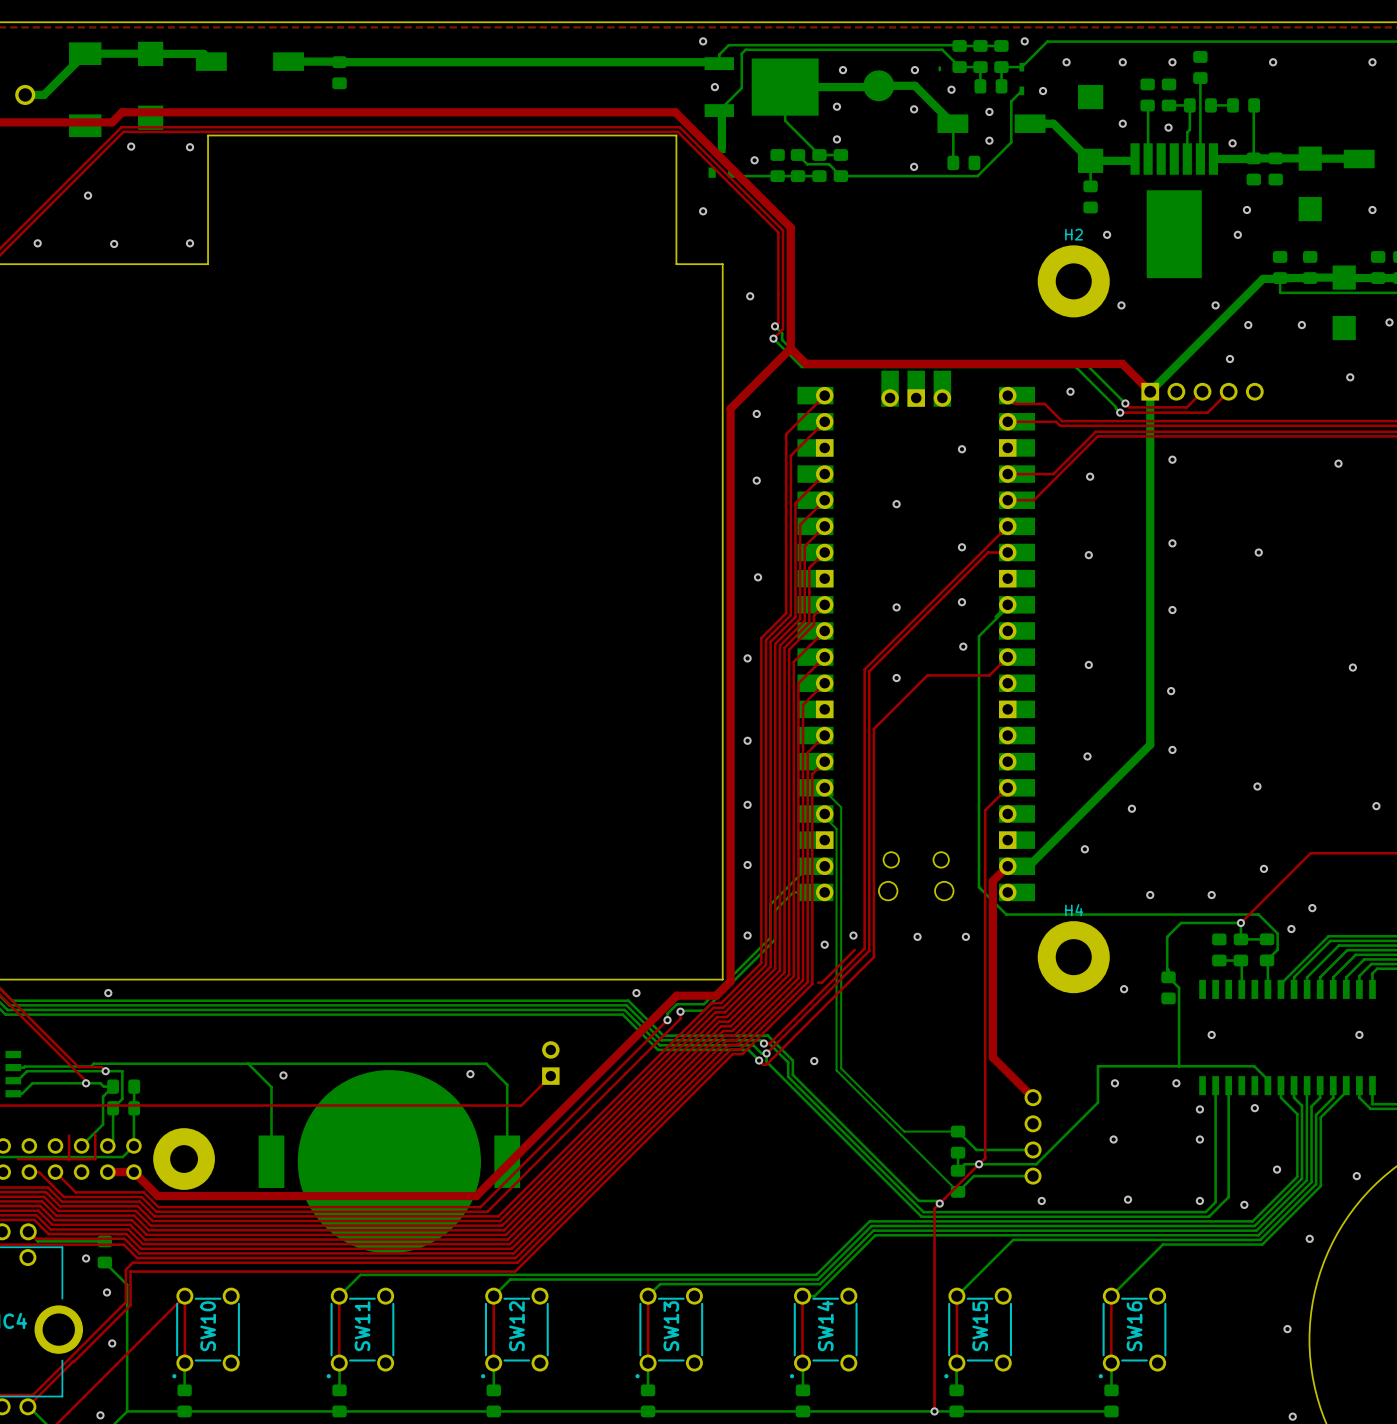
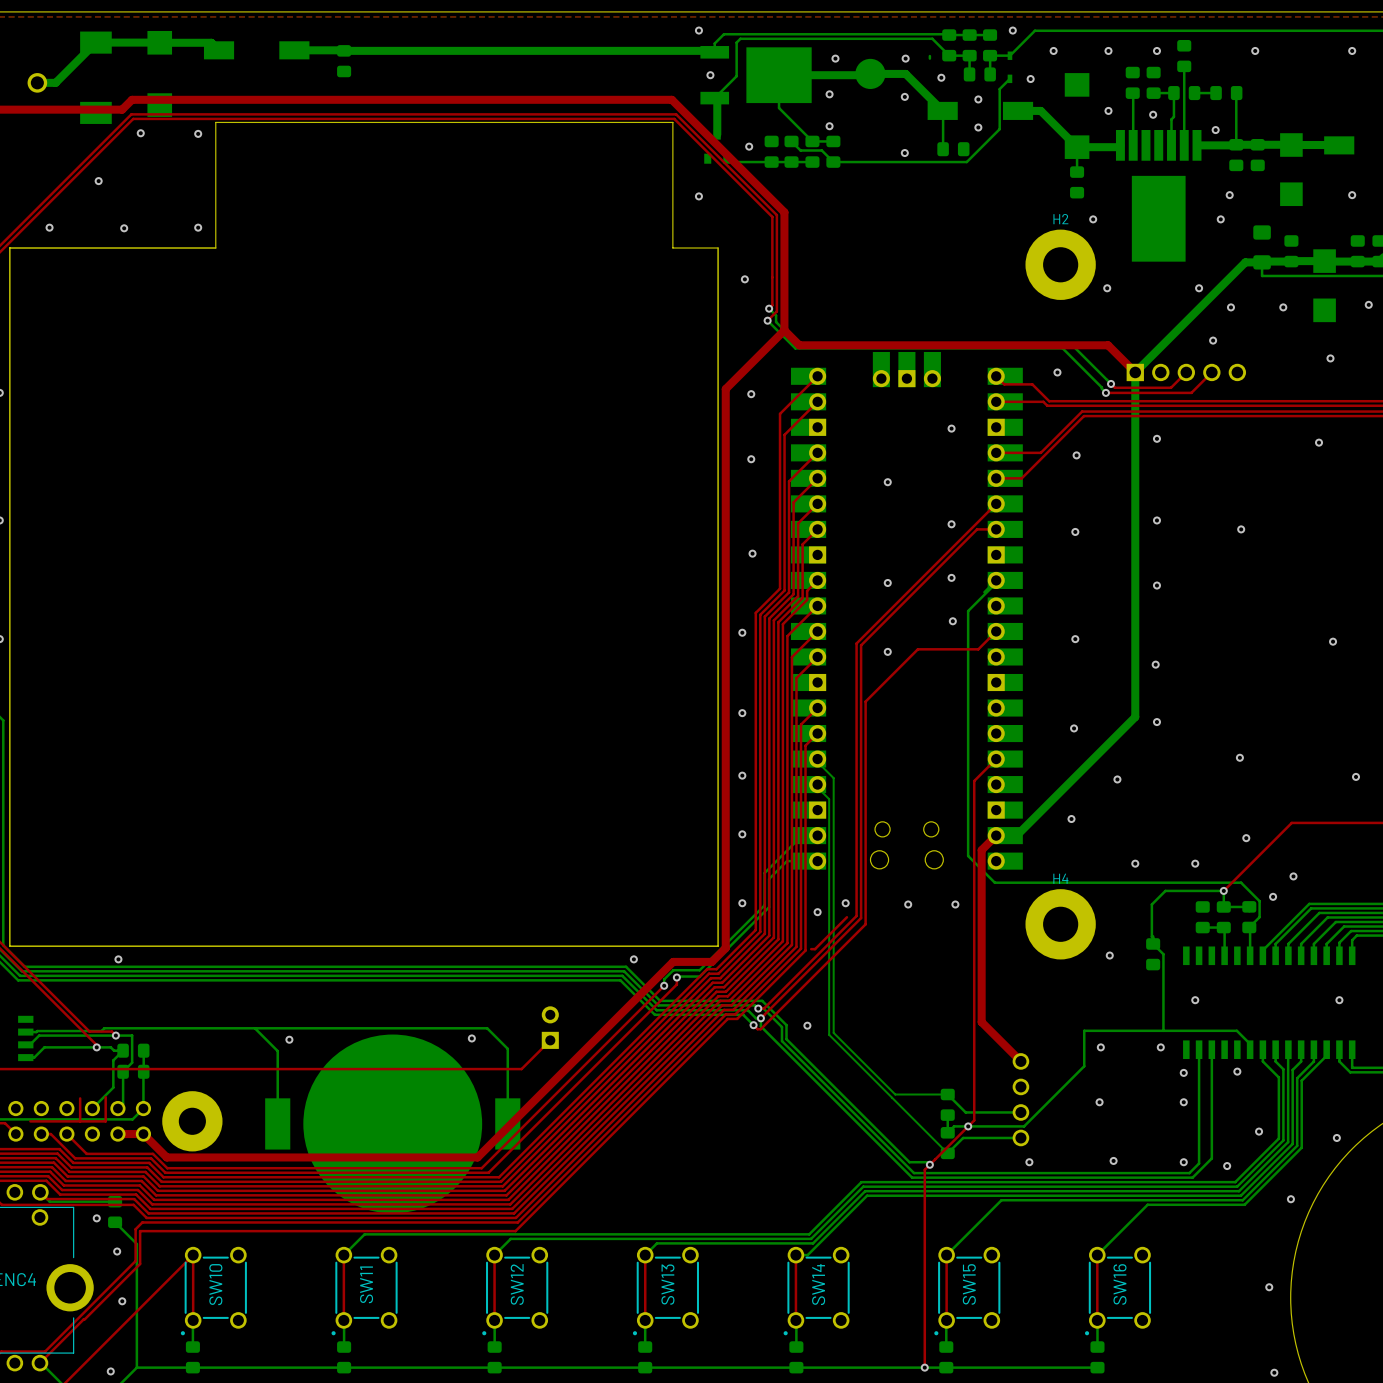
part footprint: [1272, 251, 1288, 284] -> [1253, 225, 1271, 270]

